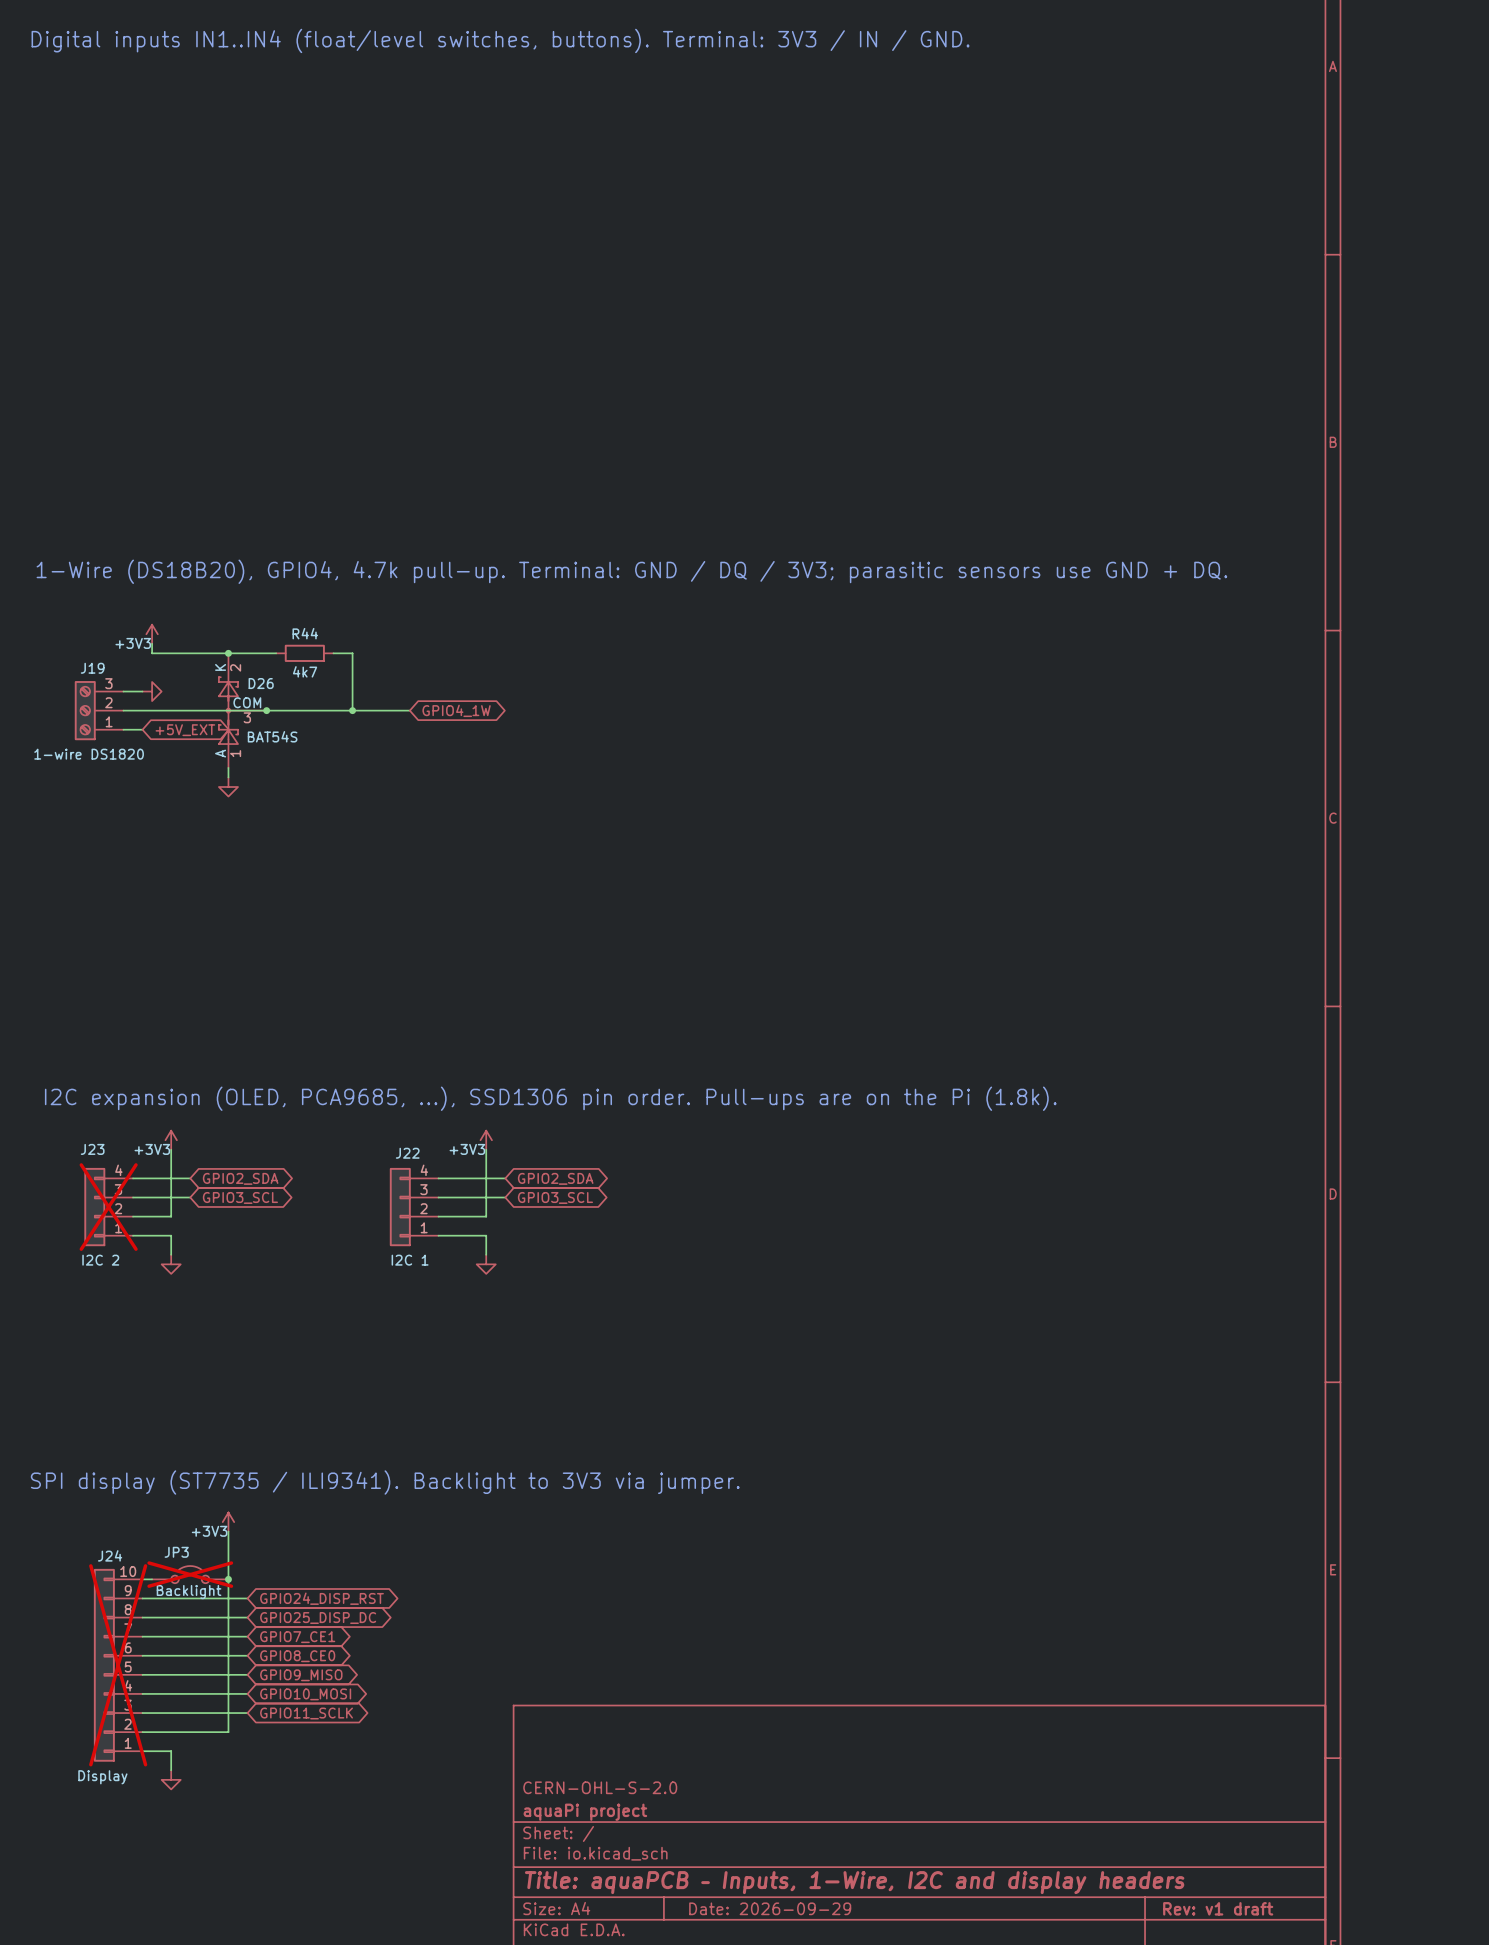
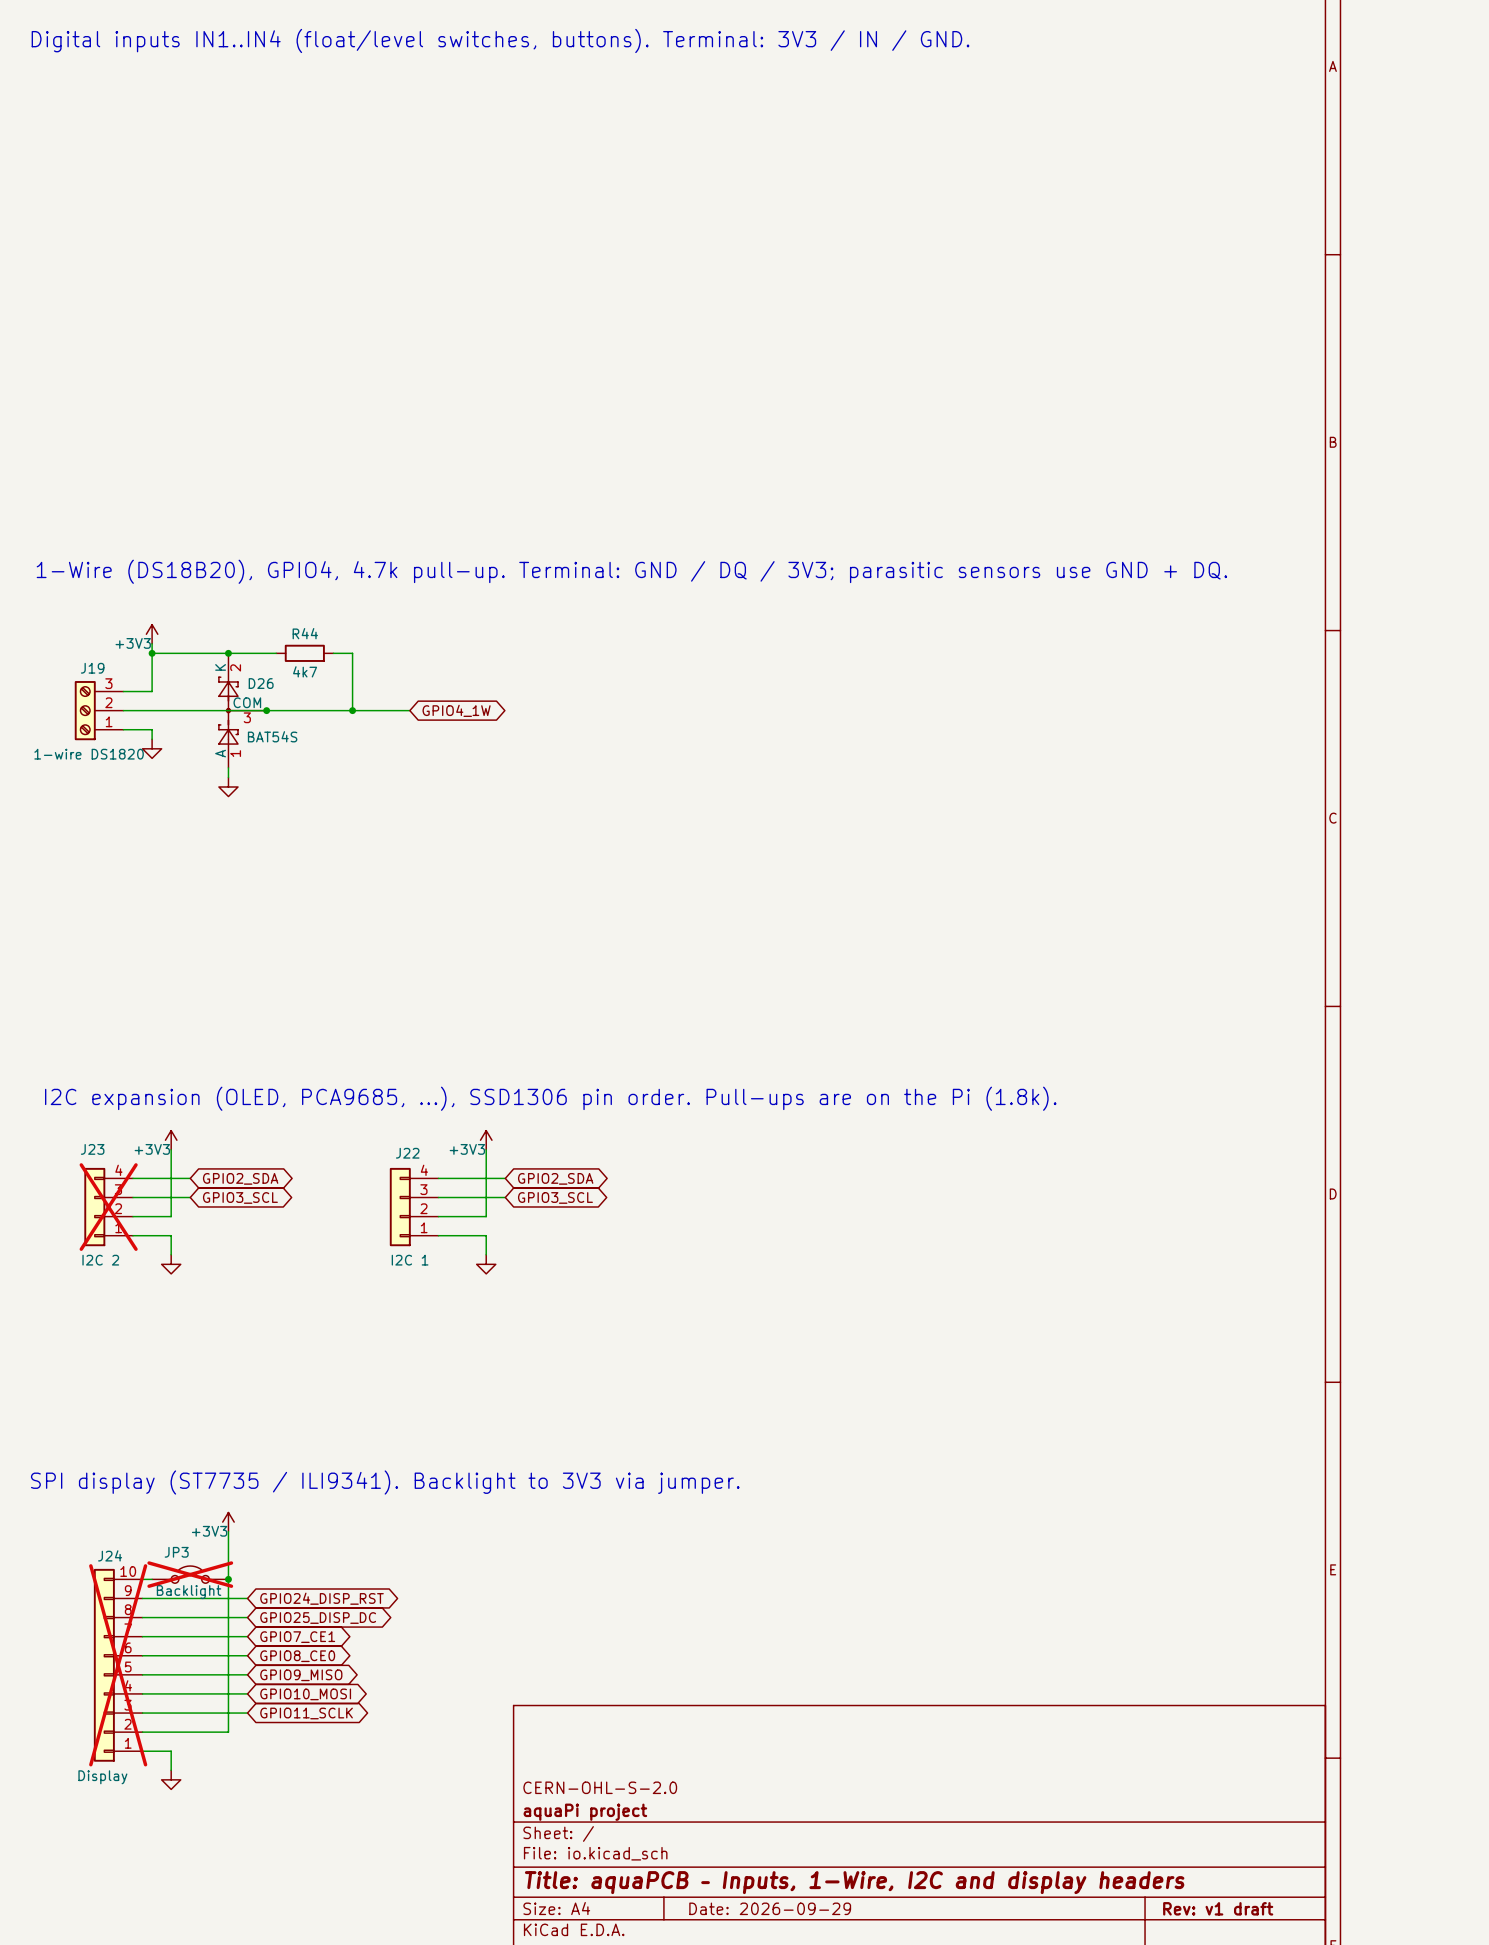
wire: none -> (152, 653) (152, 691) (142, 691)
junction: none -> (152, 653)
power symbol rotation: 0° (152, 691) -> 90° clockwise (152, 748)
power symbol position: (152, 691) -> (152, 748)
wire: none -> (142, 729) (152, 729) (152, 739)
global label: +5V_EXT (185, 730) -> none

